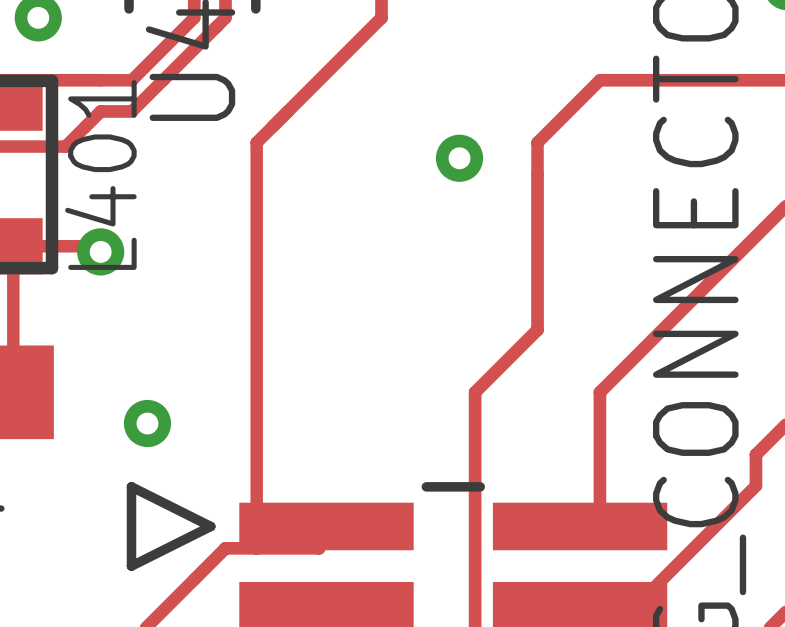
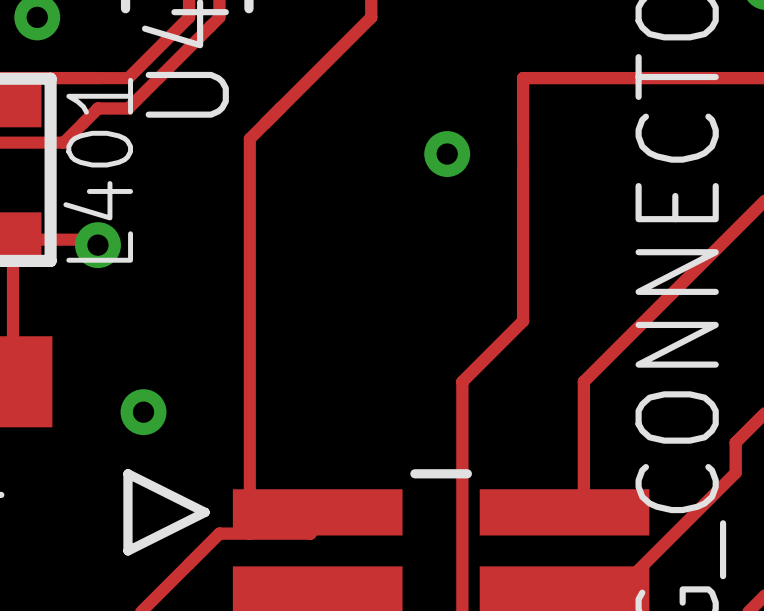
track: (599, 80) (537, 142) -> (583, 78) (523, 78) (523, 138)

